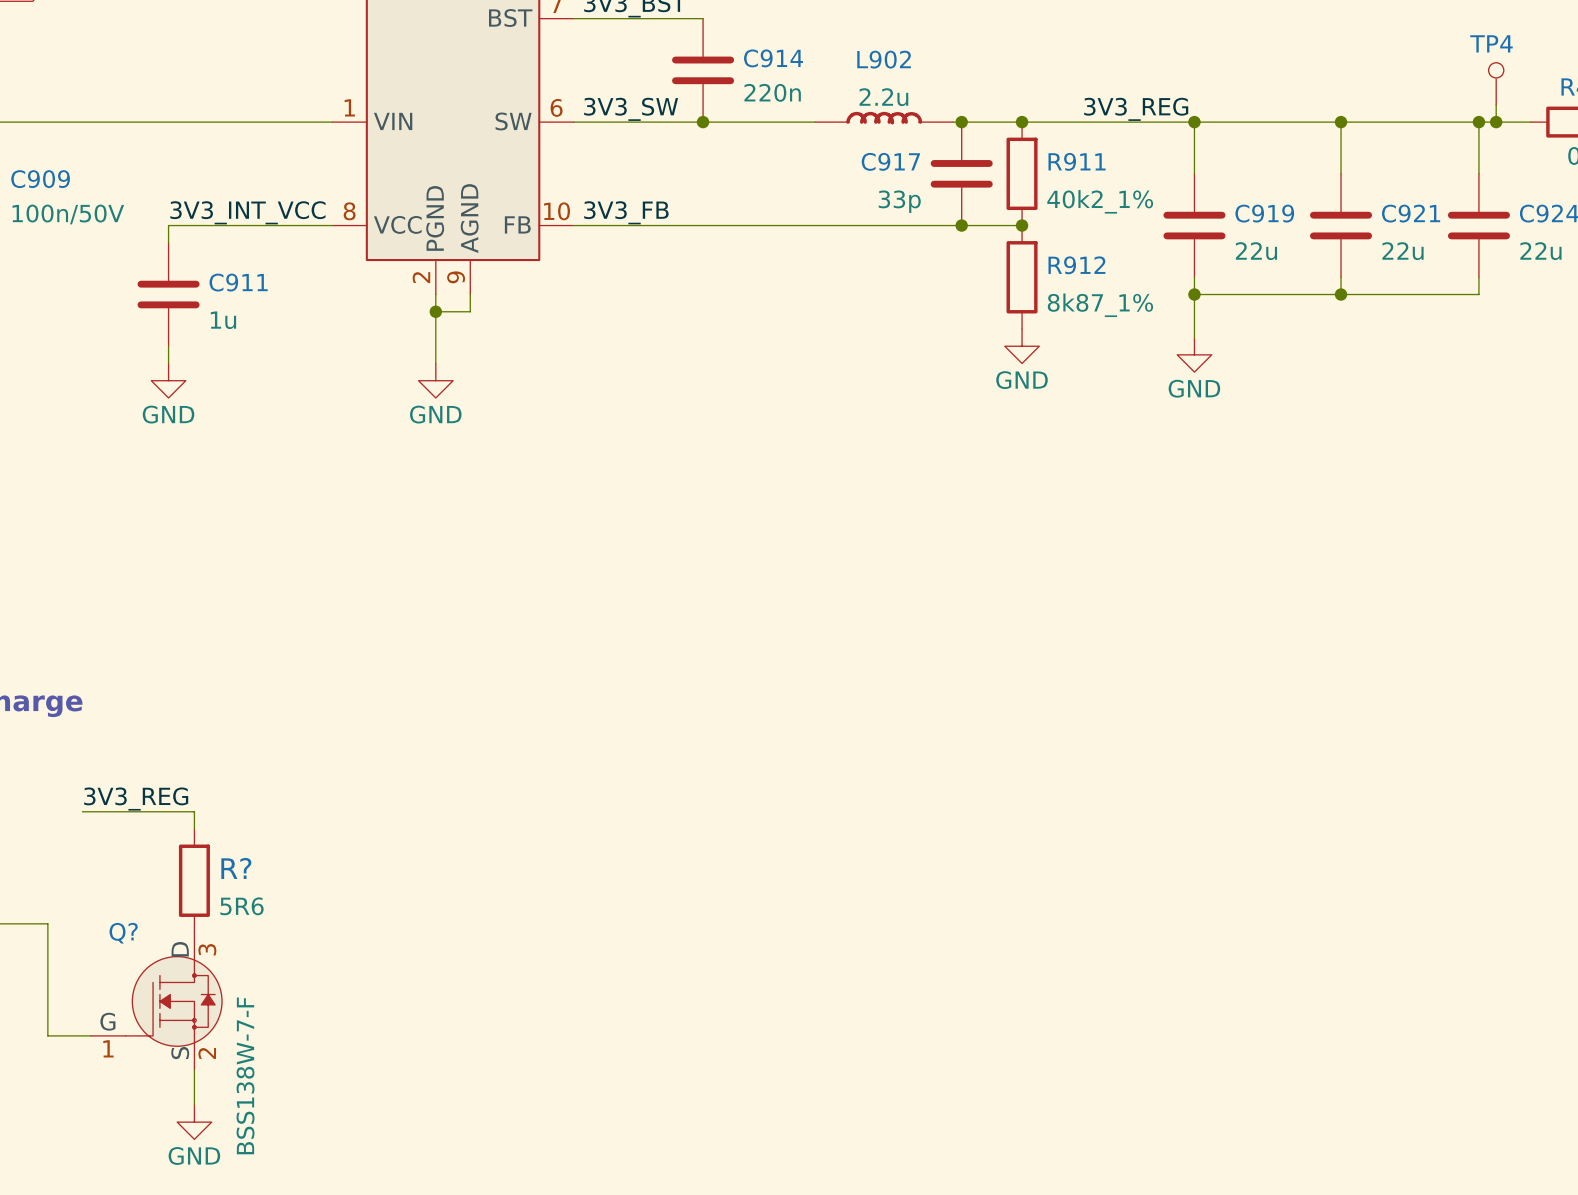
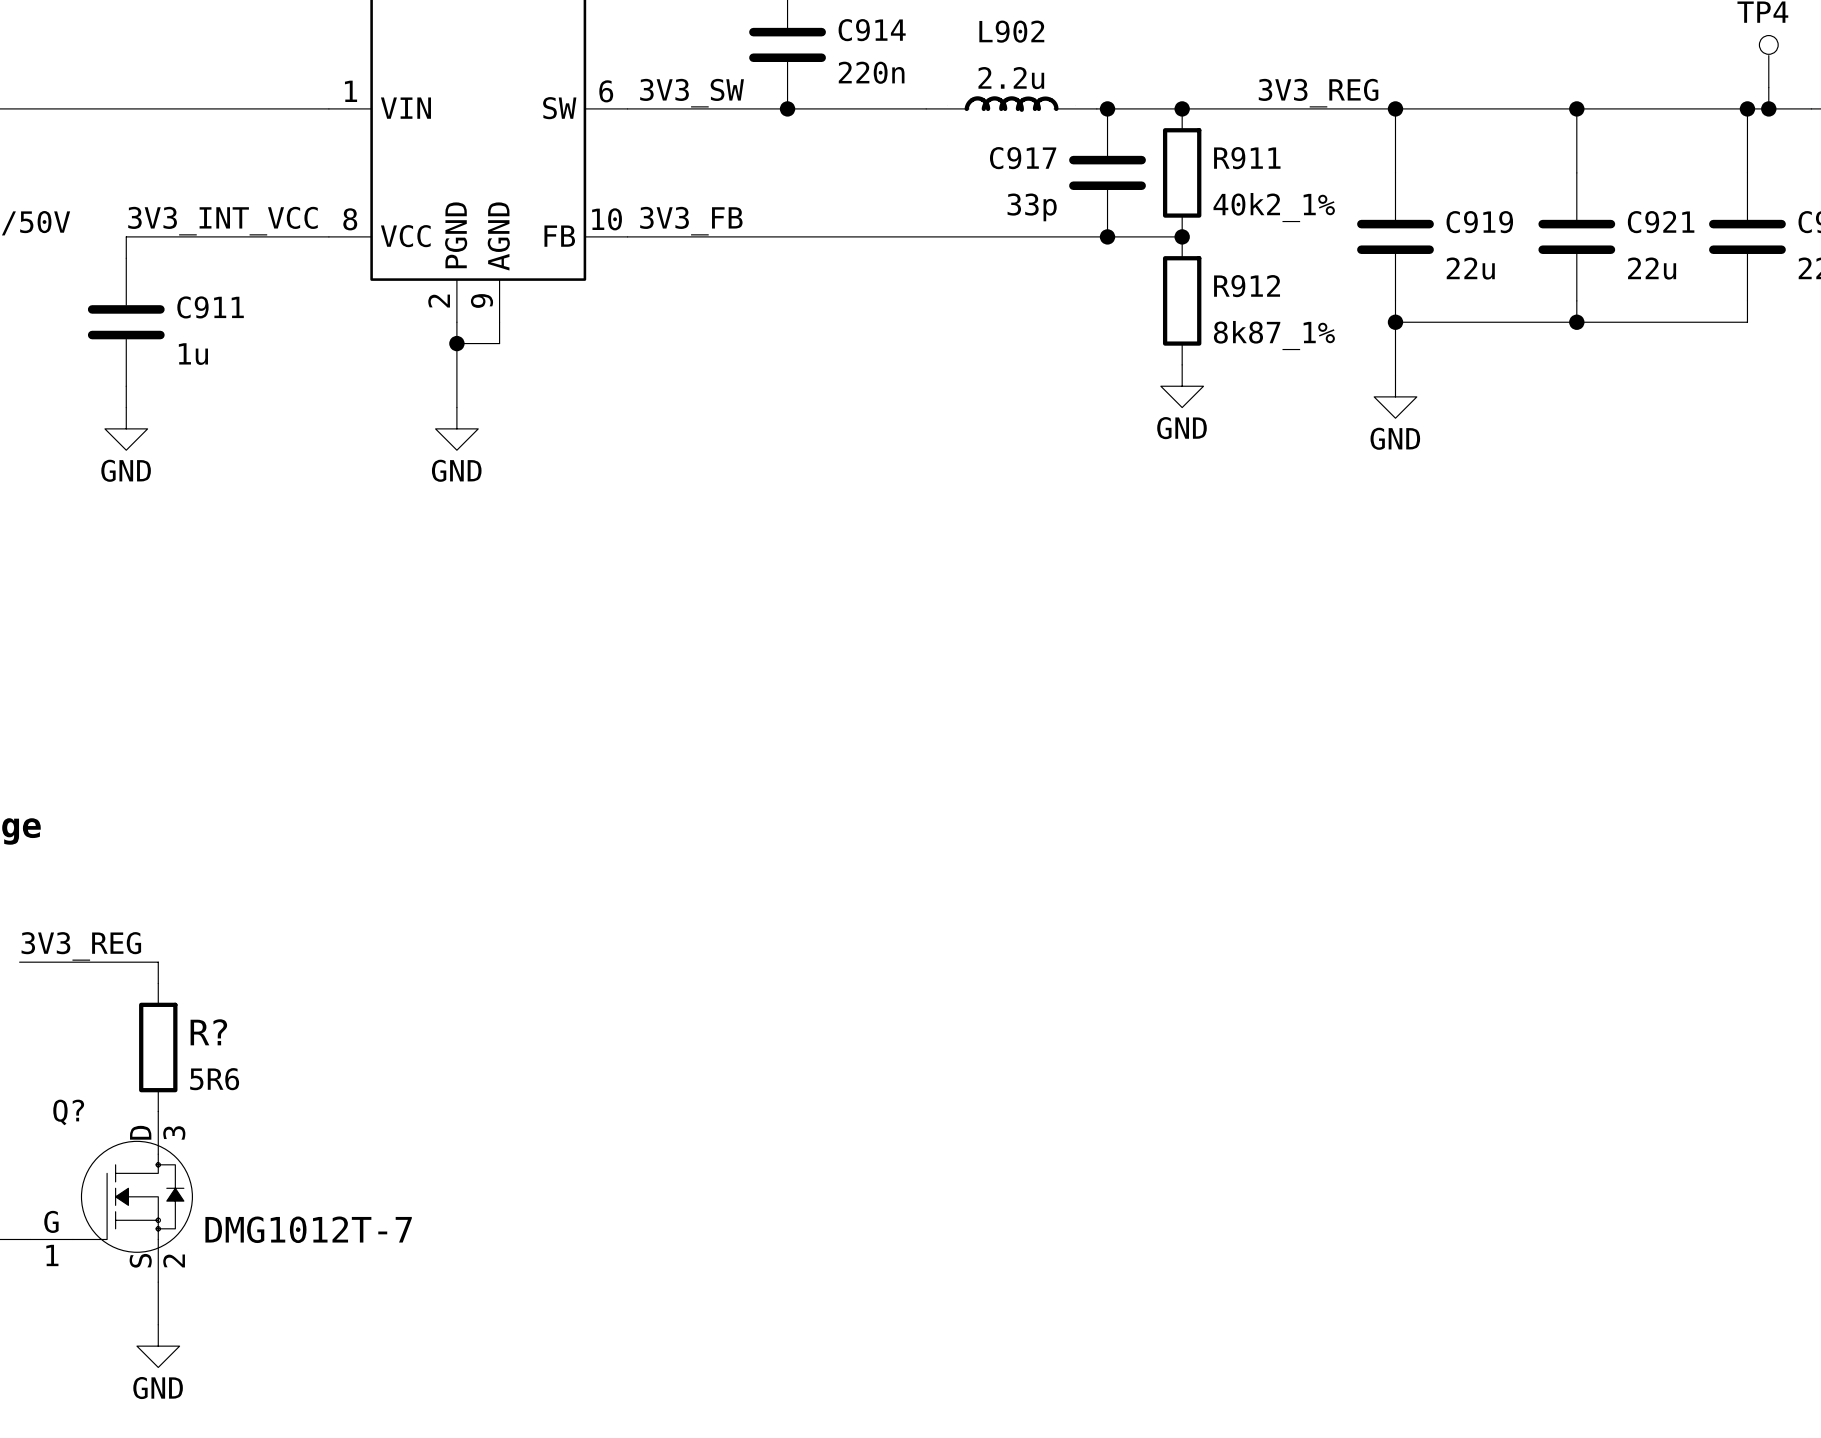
Q? value: BSS138W-7-F (245, 1075) -> DMG1012T-7 (308, 1229)

